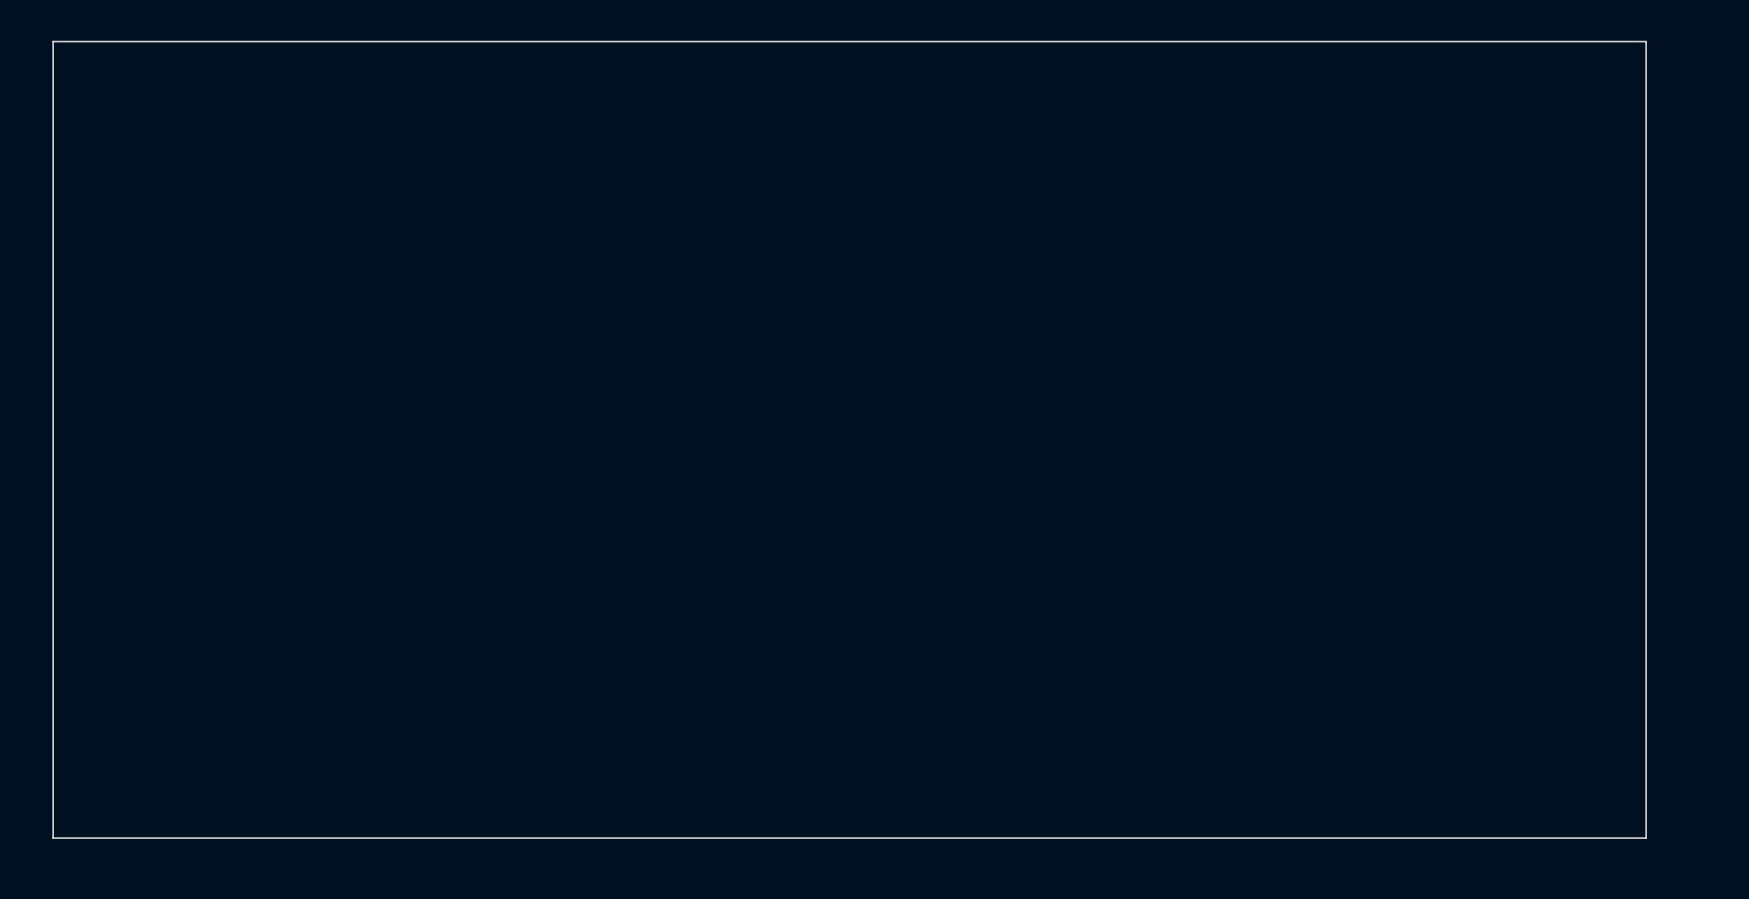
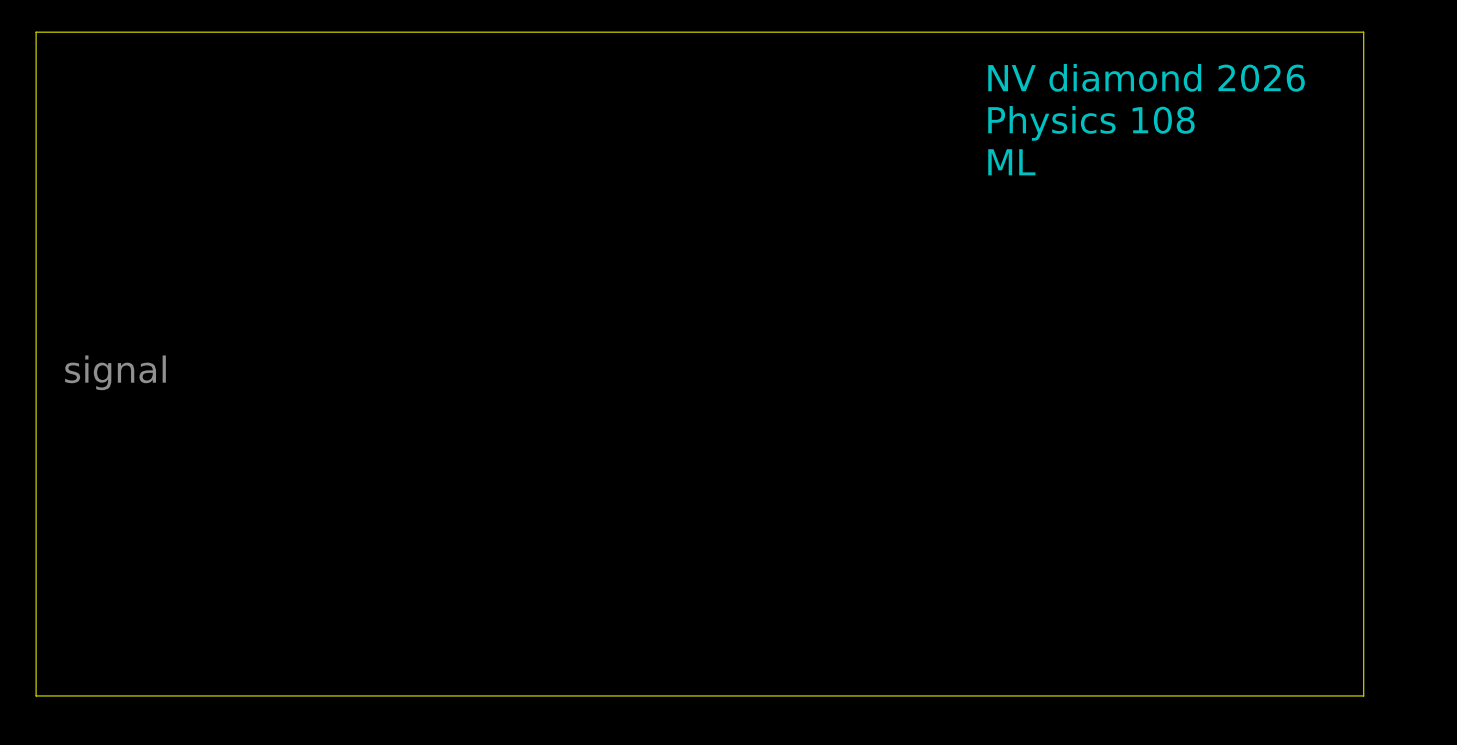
text: none -> NV diamond 2026 (1146, 77)
text: none -> Physics 108 (1091, 123)
text: none -> ML (1011, 162)
drawing: none -> [65, 355, 166, 391]

